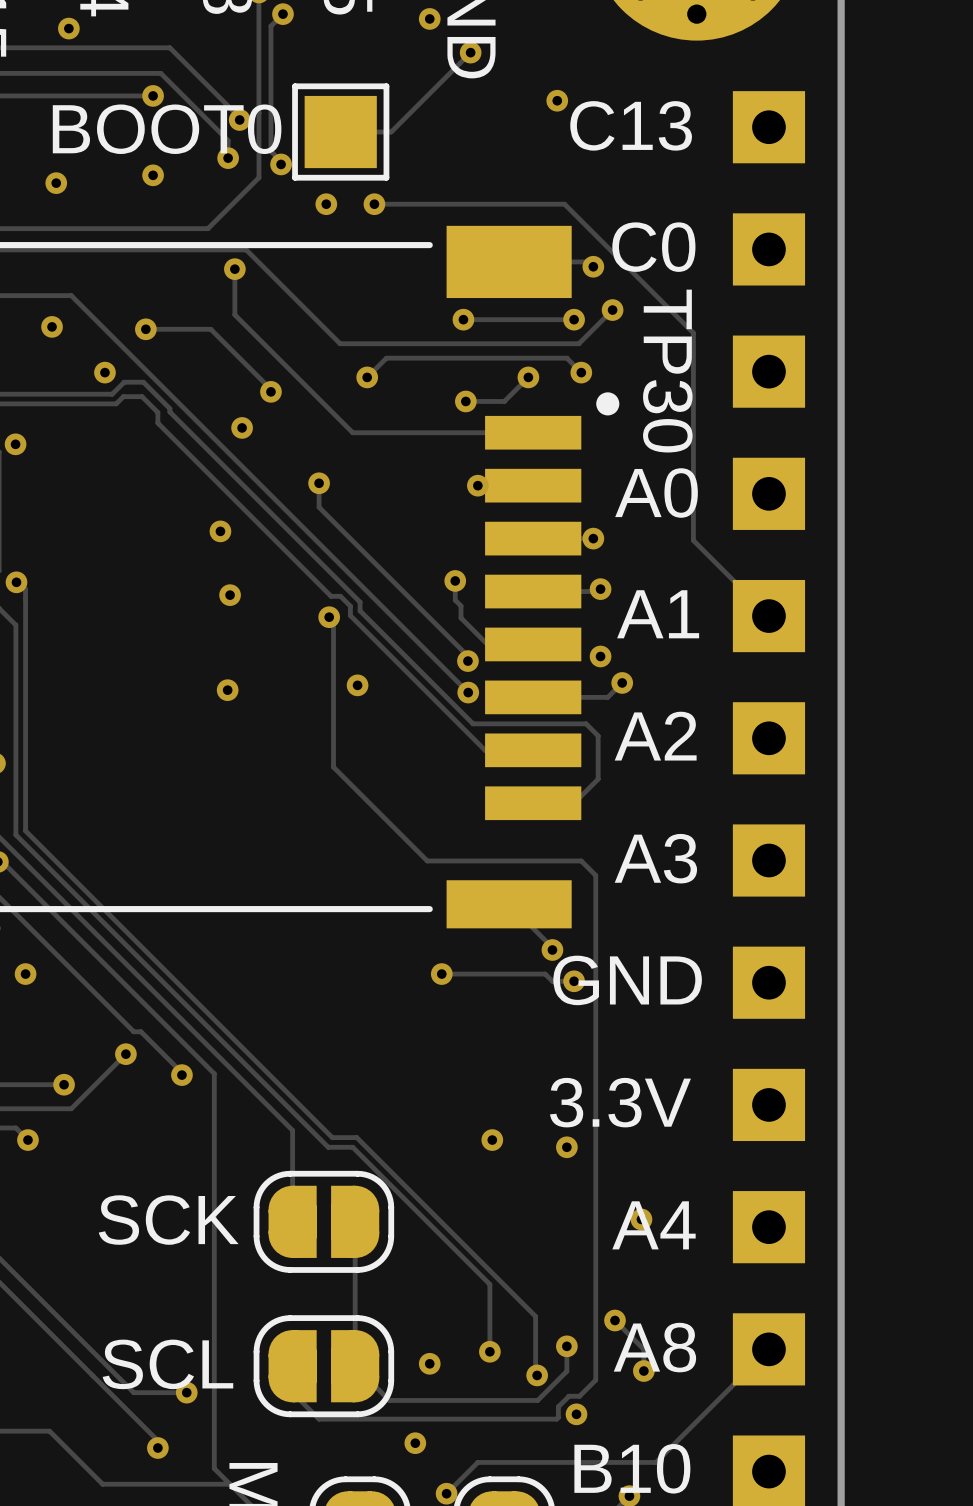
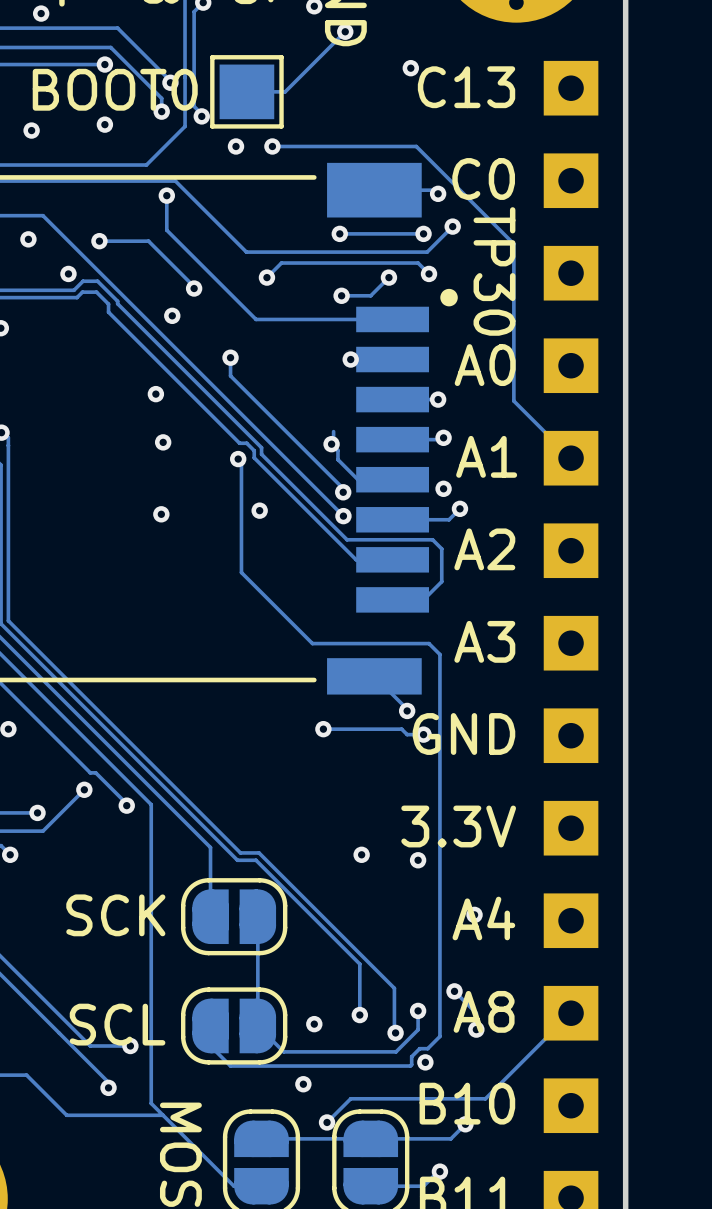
via position: (455, 580) -> (331, 444)

